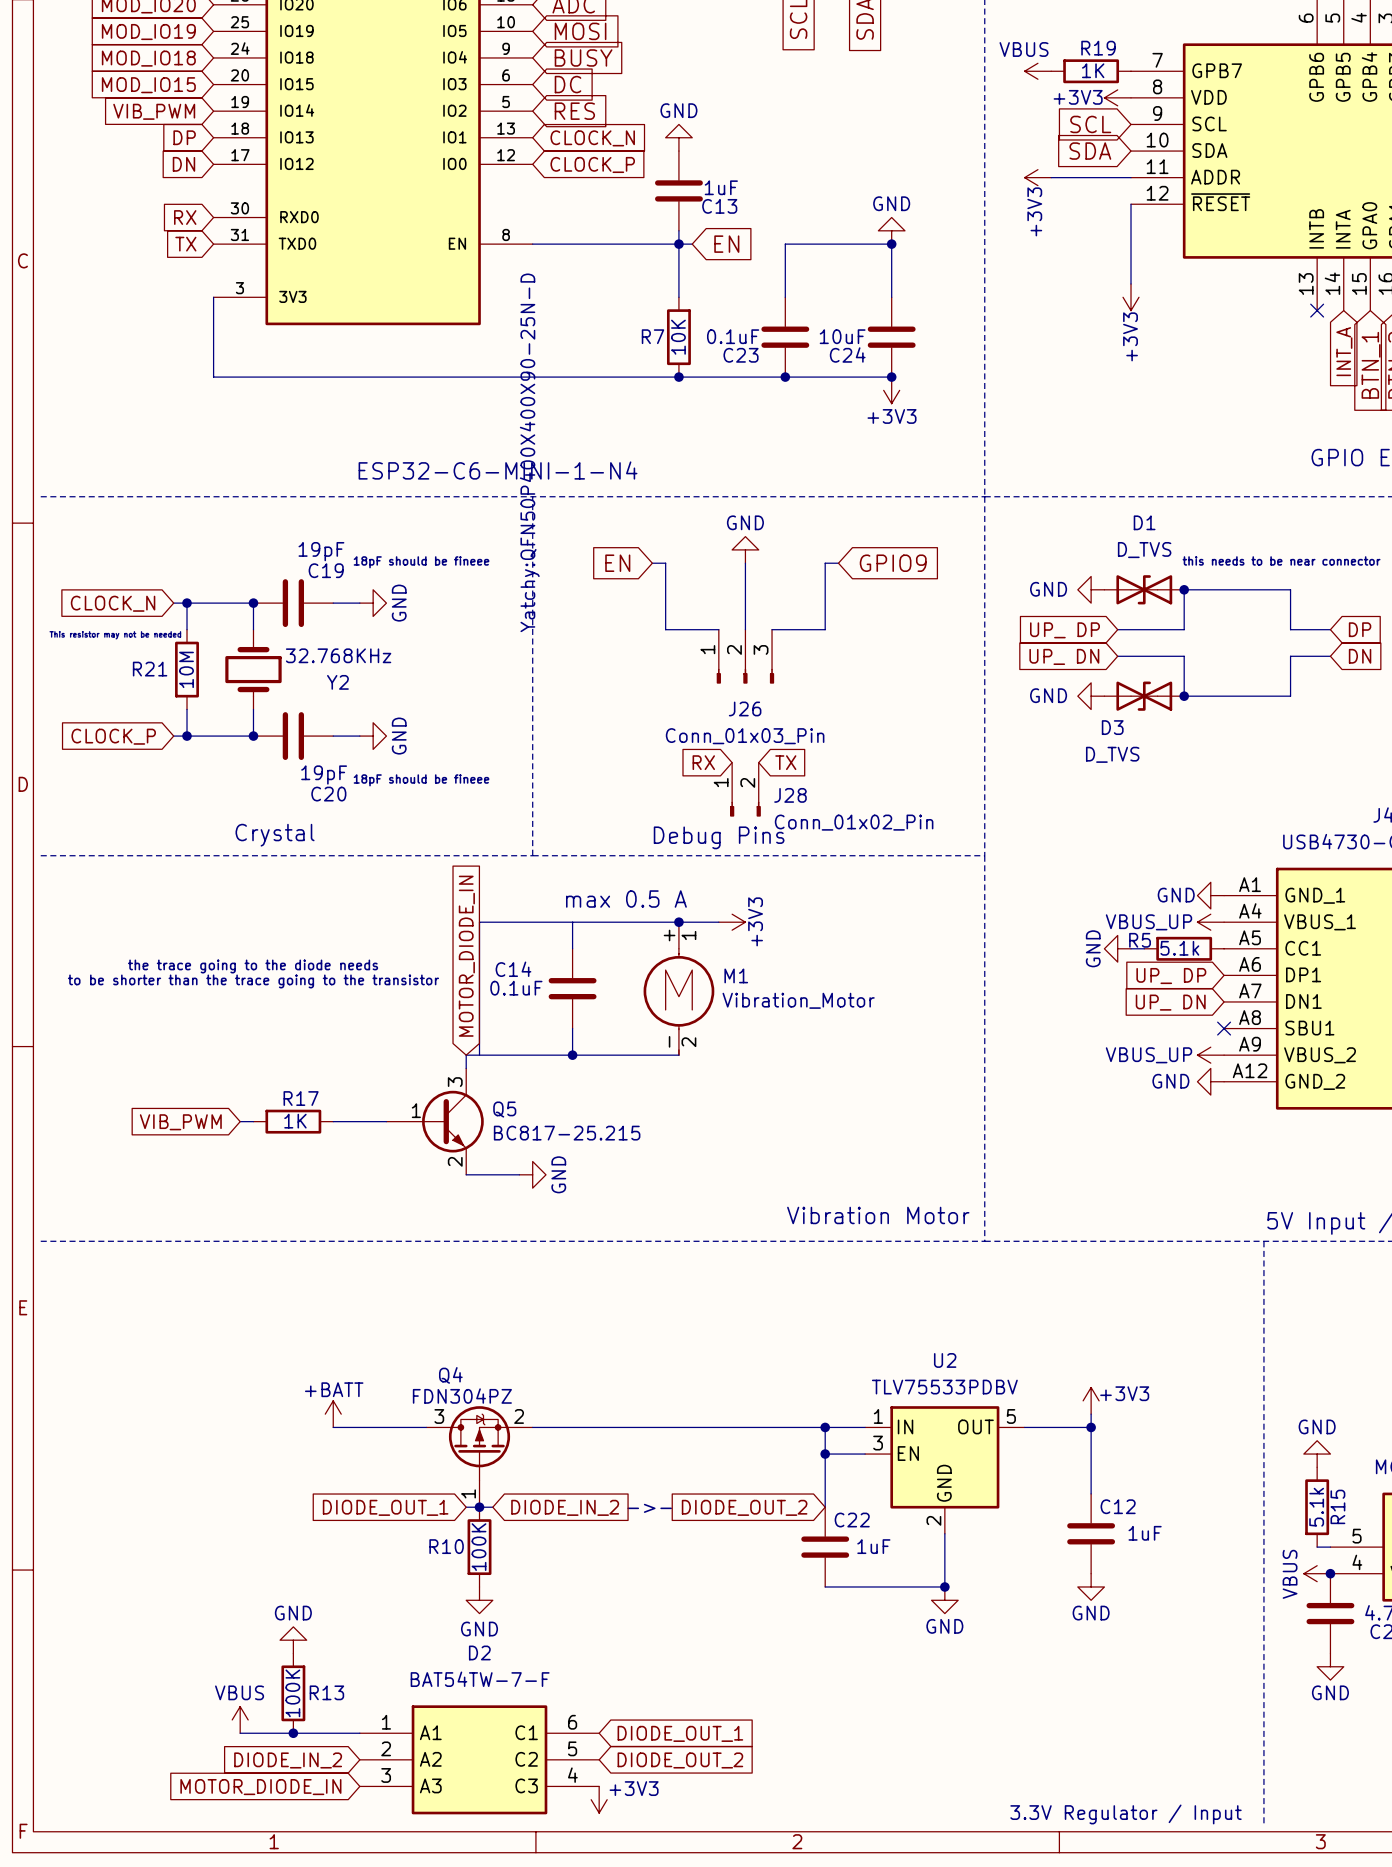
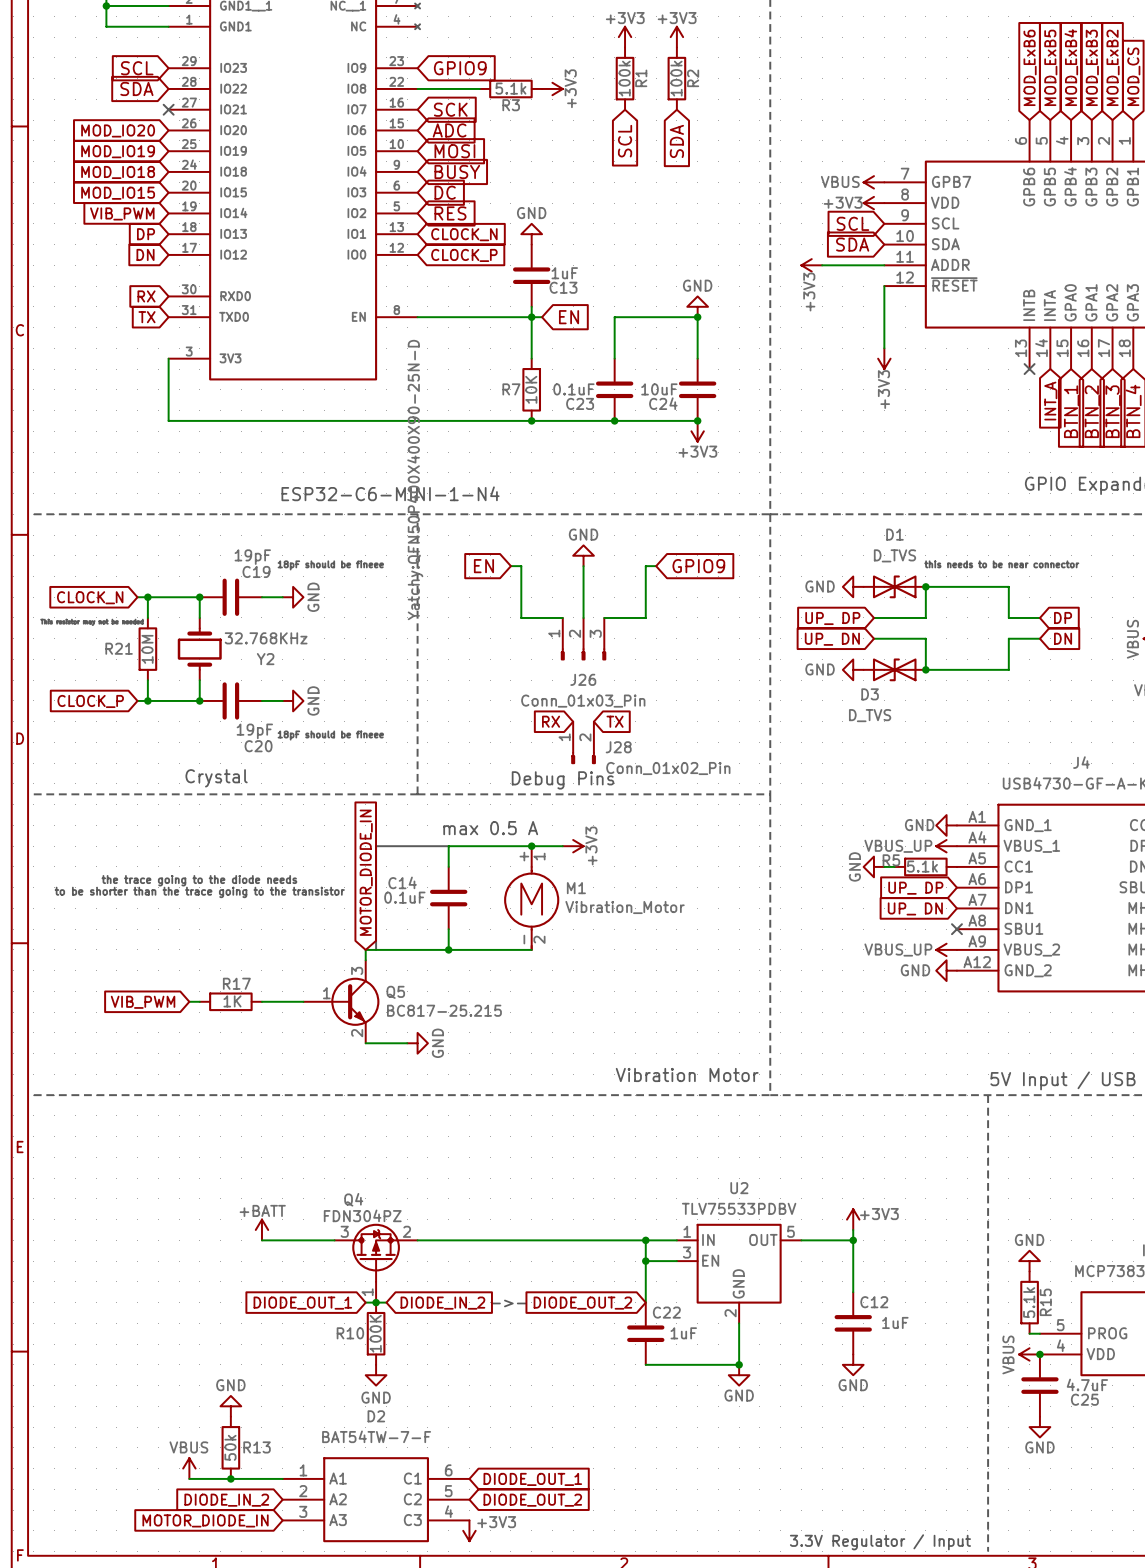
power symbol text position: VBUS (1024, 49) -> VBUS (840, 181)
power symbol position: VBUS (1037, 71) -> VBUS (873, 182)
R19: 1K (1091, 71) -> none
R13 value: 100K (292, 1693) -> 50k (230, 1447)

